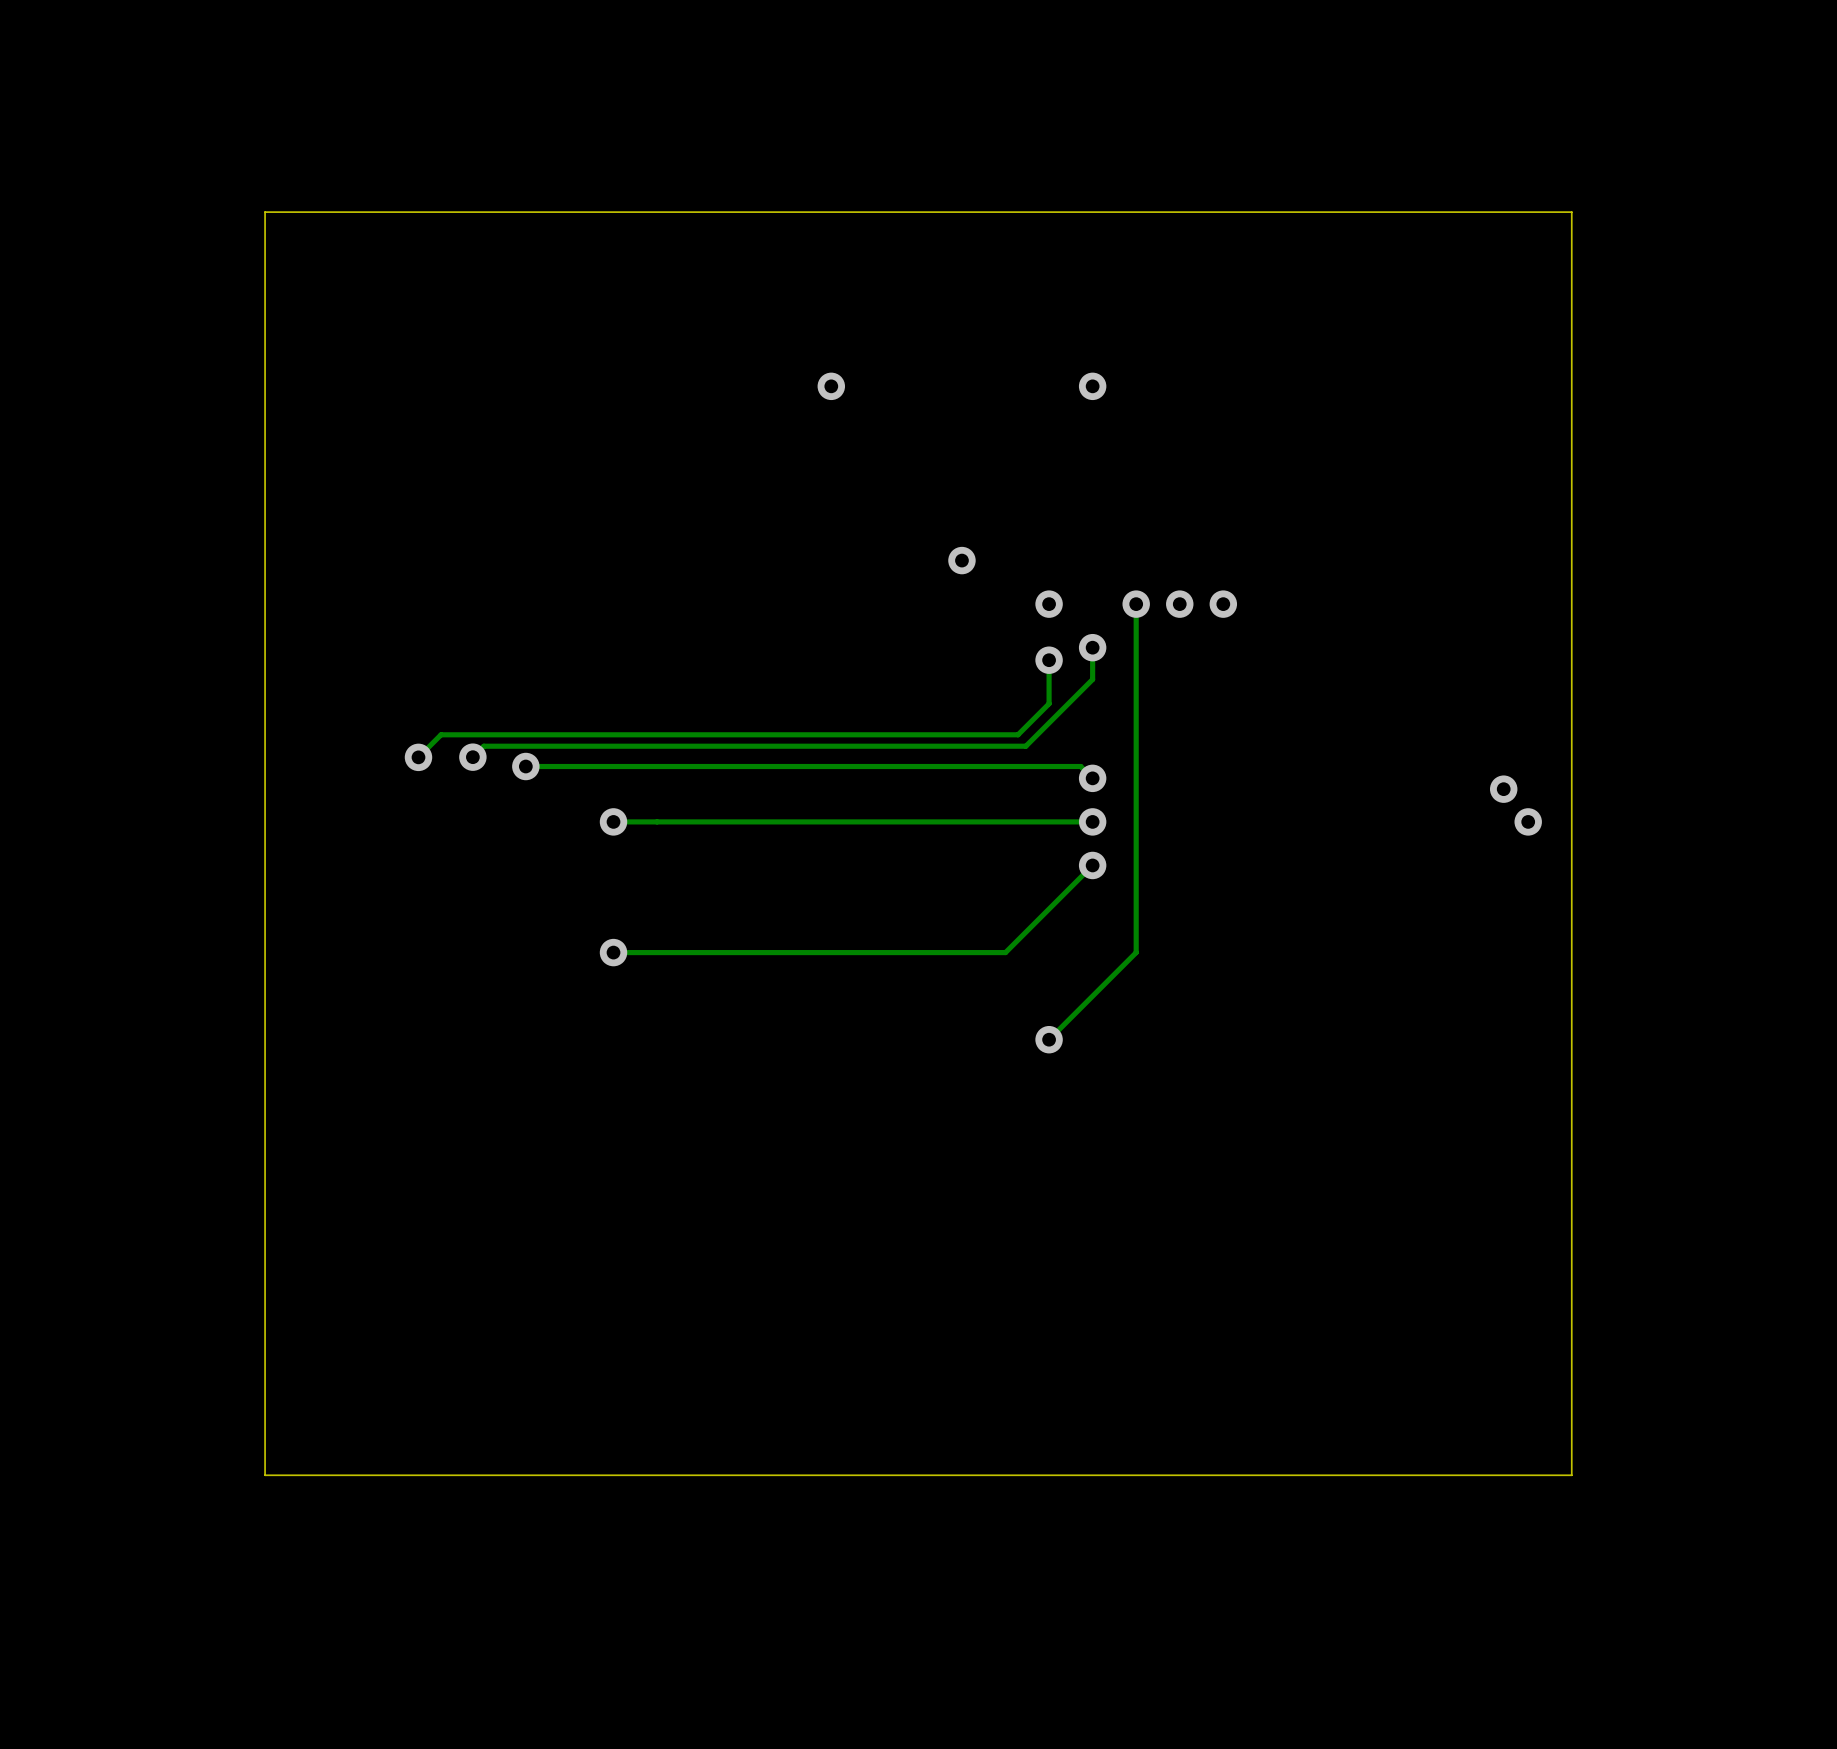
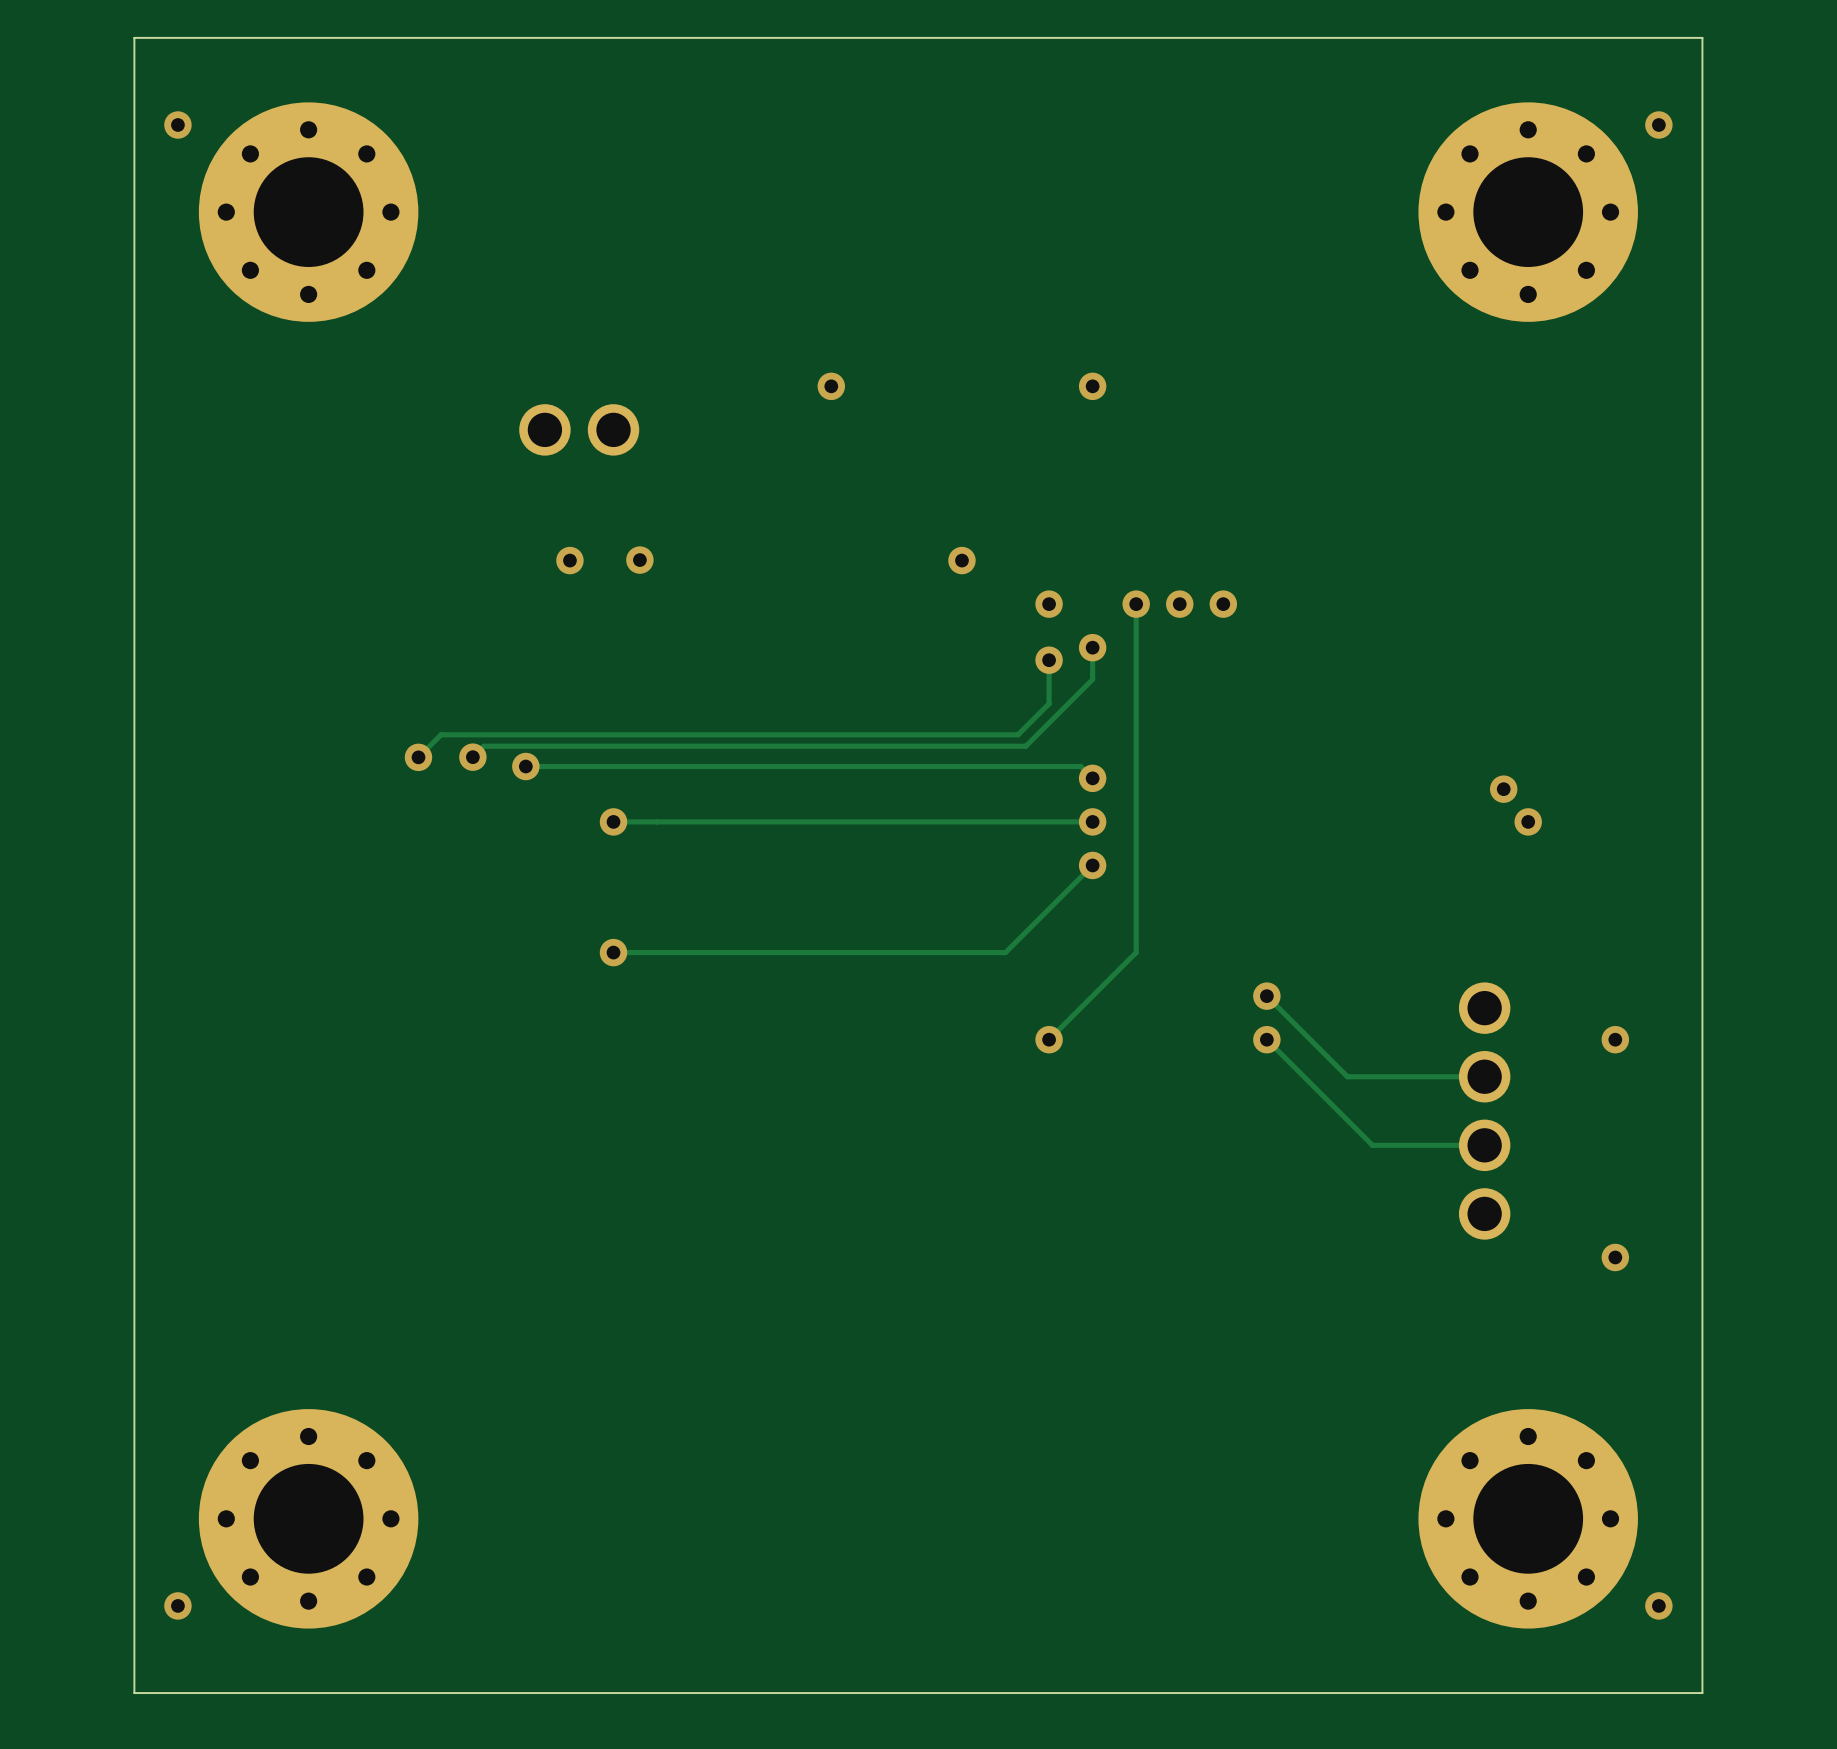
via: none -> (177, 125)
via: none -> (1658, 125)
part: none -> (308, 212)
part: none -> (1528, 212)
board edge: (1571, 212) (265, 212) (265, 1475) (1571, 1475) (1571, 212) -> (1702, 37) (1702, 1693) (134, 1693) (134, 37) (1702, 37)
part: none -> (579, 429)
via: none -> (569, 560)
via: none -> (639, 560)
track: none -> (1266, 996) (1347, 1076) (1484, 1076)
via: none -> (1266, 996)
track: none -> (1266, 1039) (1372, 1145) (1484, 1145)
via: none -> (1266, 1039)
via: none -> (1615, 1039)
part: none -> (1484, 1111)
via: none -> (1615, 1257)
part: none -> (308, 1518)
part: none -> (1528, 1518)
via: none -> (177, 1605)
via: none -> (1658, 1605)

